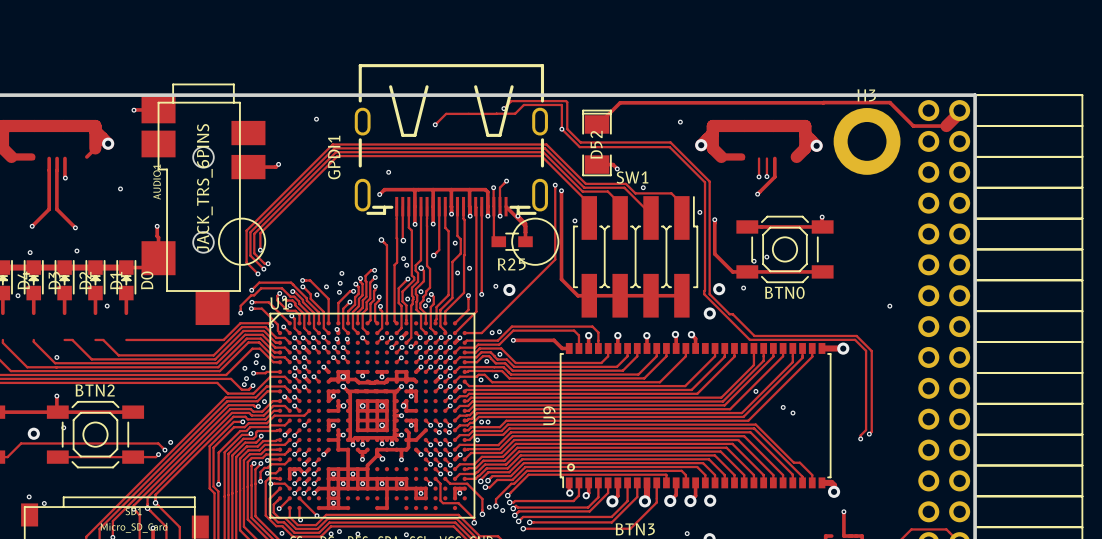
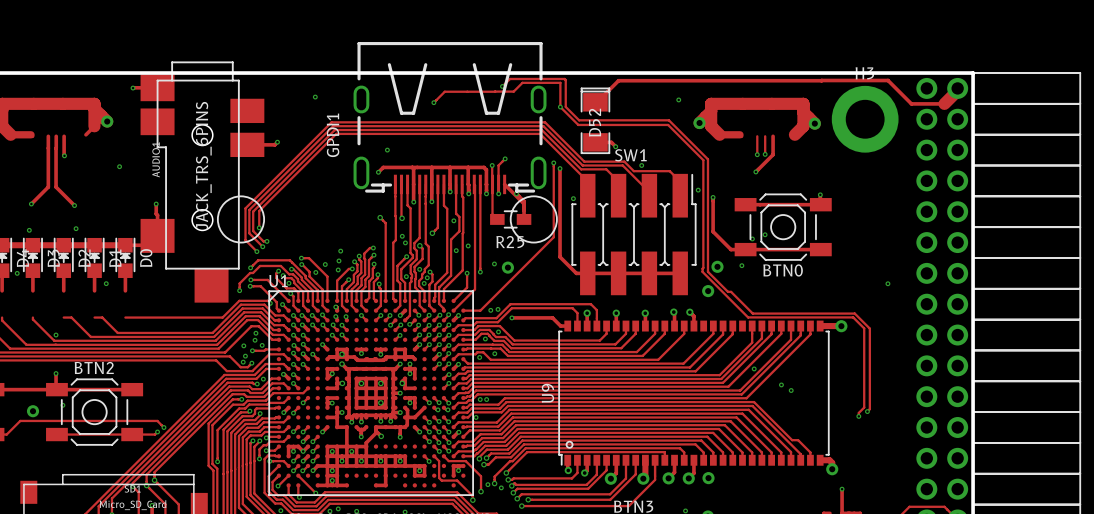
track: (299, 439) (294, 444) -> none
via: (170, 442) -> none
via: (294, 444) -> none
via: (29, 496) -> none
via: (44, 503) -> none

